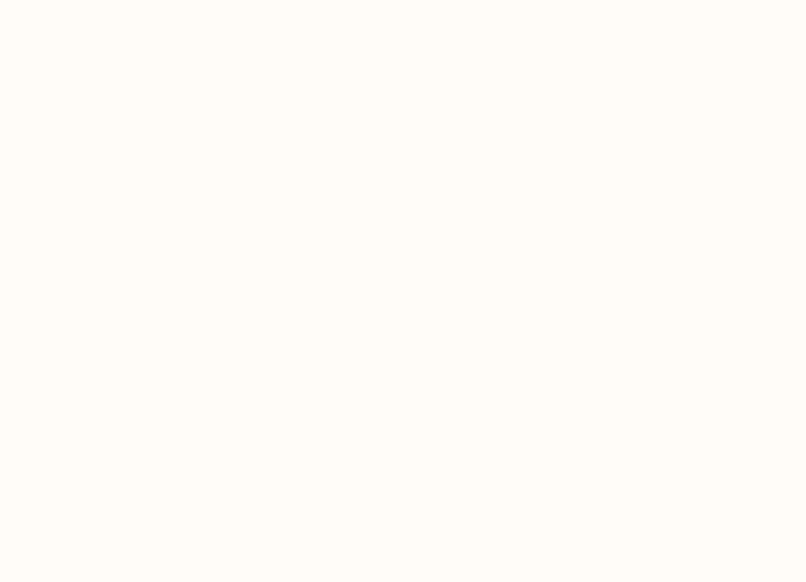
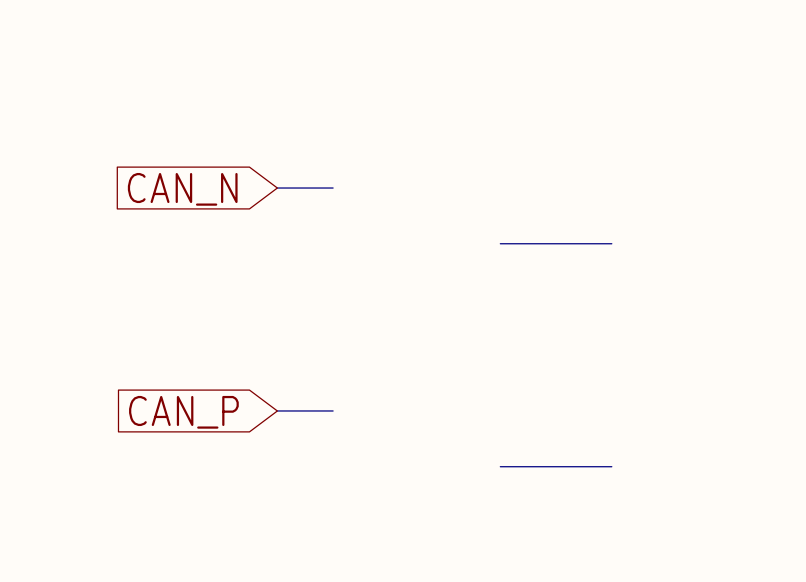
wire: none -> (277, 188) (333, 188)
global label: none -> CAN_N (182, 189)
wire: none -> (500, 243) (611, 243)
wire: none -> (277, 410) (333, 410)
global label: none -> CAN_P (183, 412)
wire: none -> (500, 466) (611, 466)

